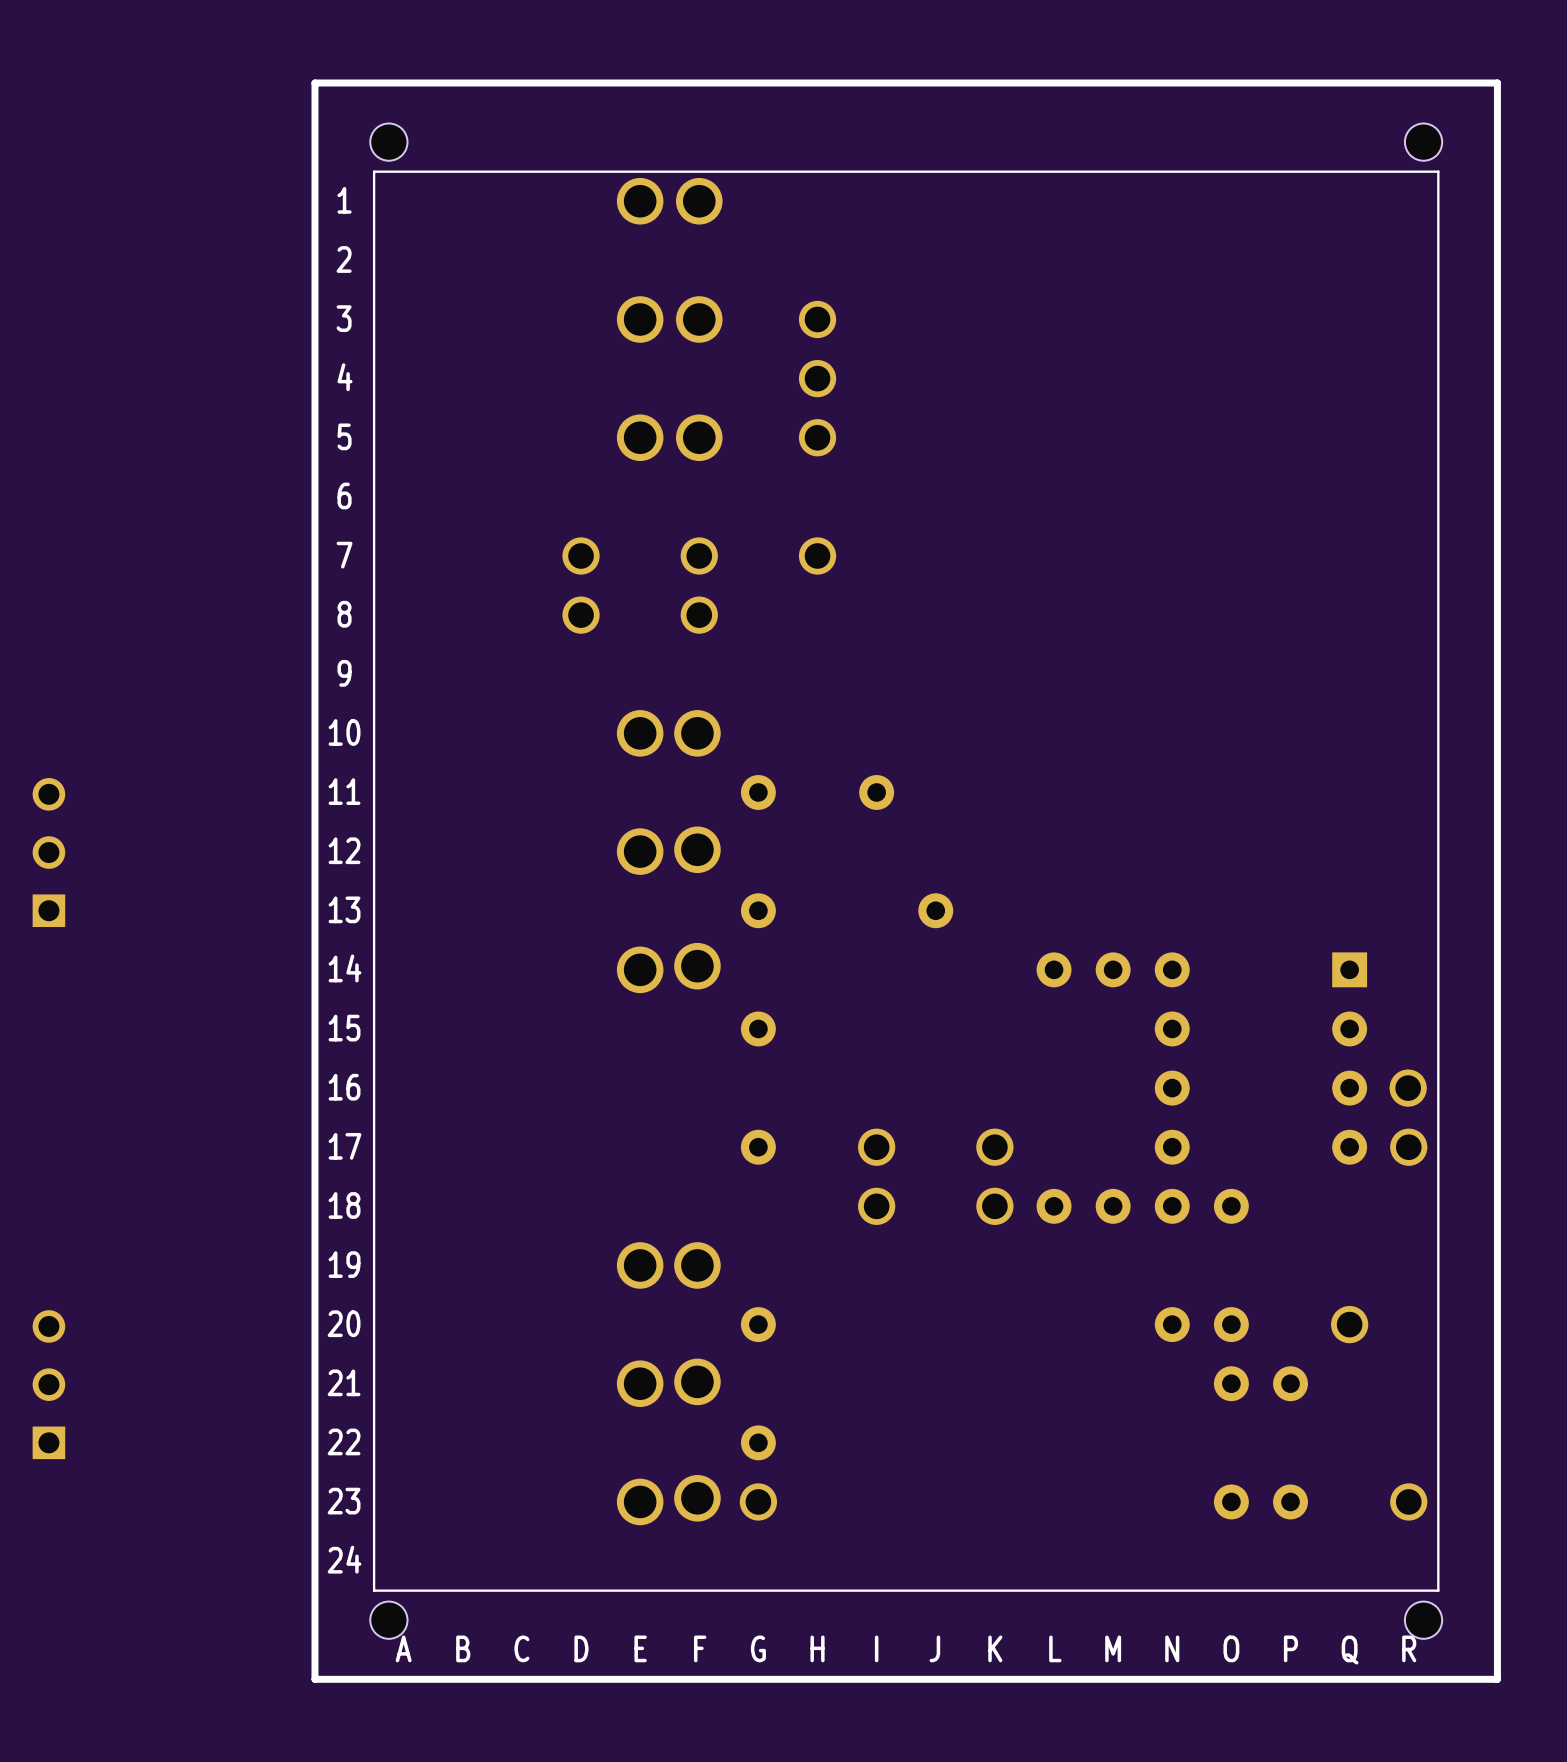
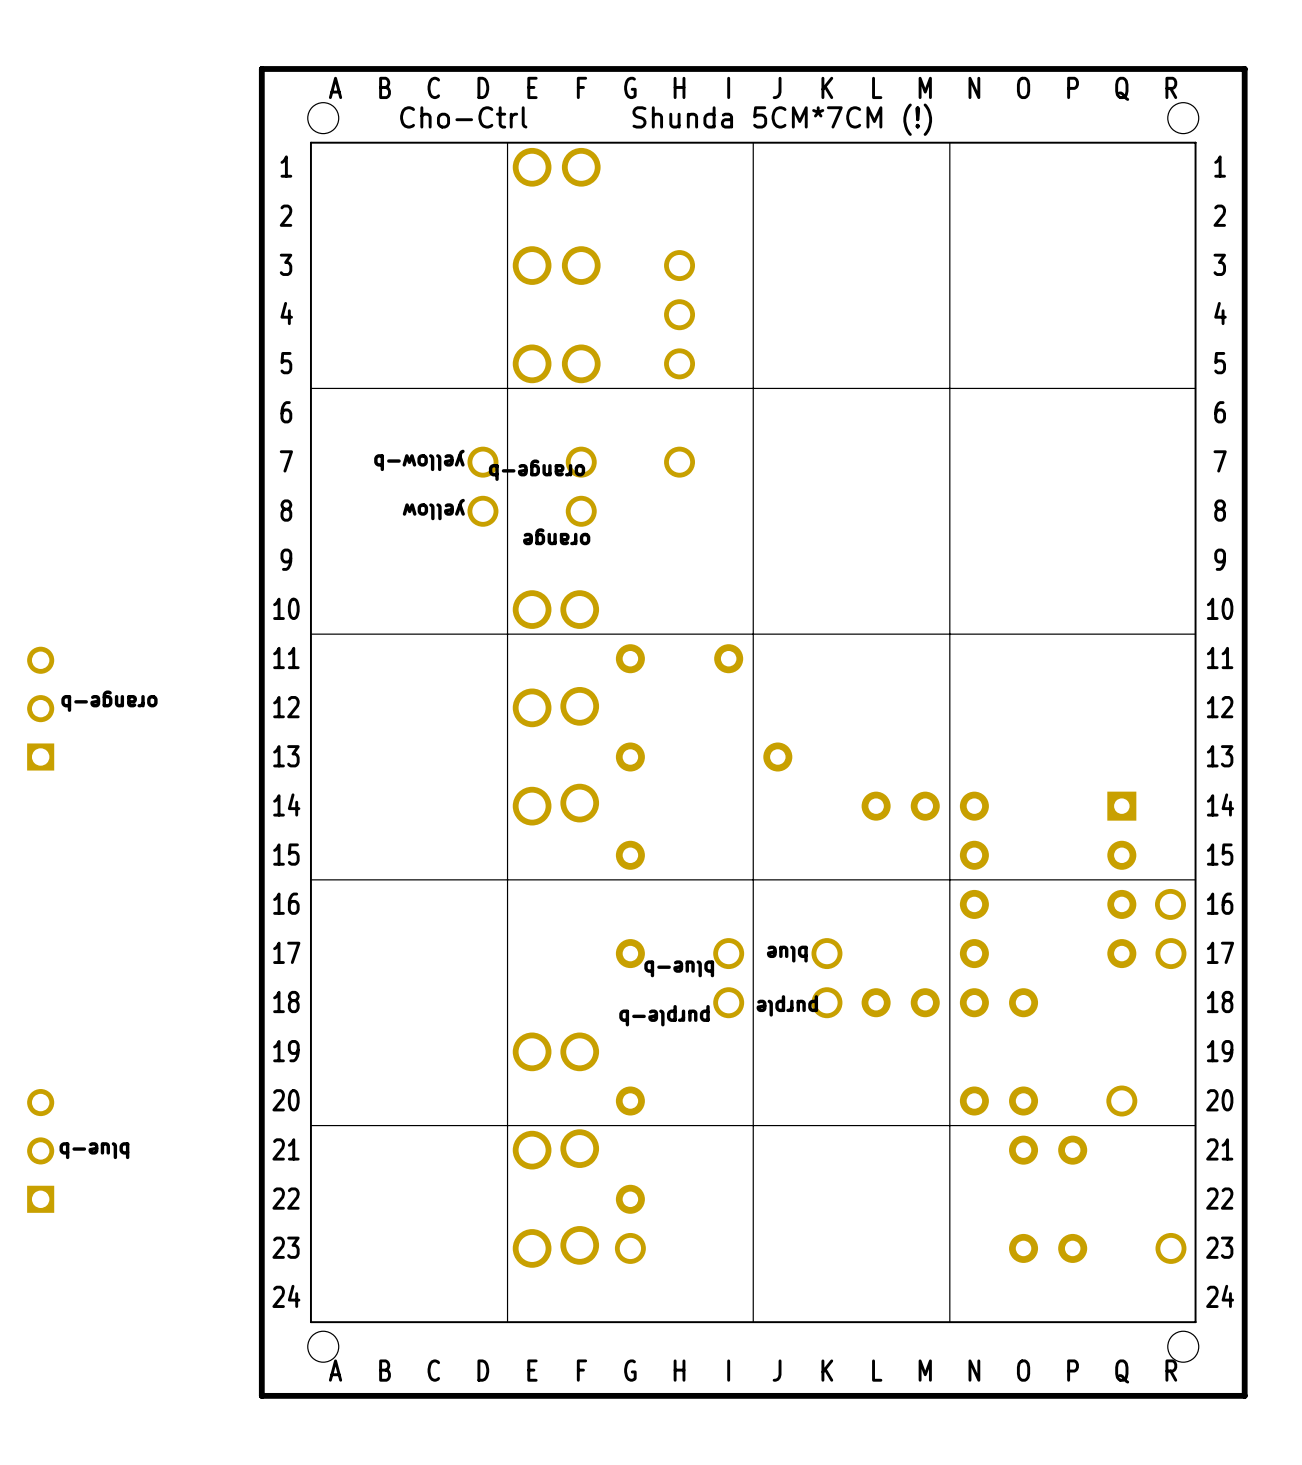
part footprint: [311, 79, 1501, 1683] -> [258, 66, 1248, 1399]
text: none -> yellow-b (419, 460)
text: none -> orange-b (537, 470)
text: none -> yellow (433, 509)
text: none -> orange (556, 536)
text: none -> orange-b (109, 701)
text: none -> blue (787, 954)
text: none -> blue-b (679, 968)
text: none -> purple (787, 1005)
text: none -> purple-b (664, 1015)
text: none -> blue-b (94, 1150)

